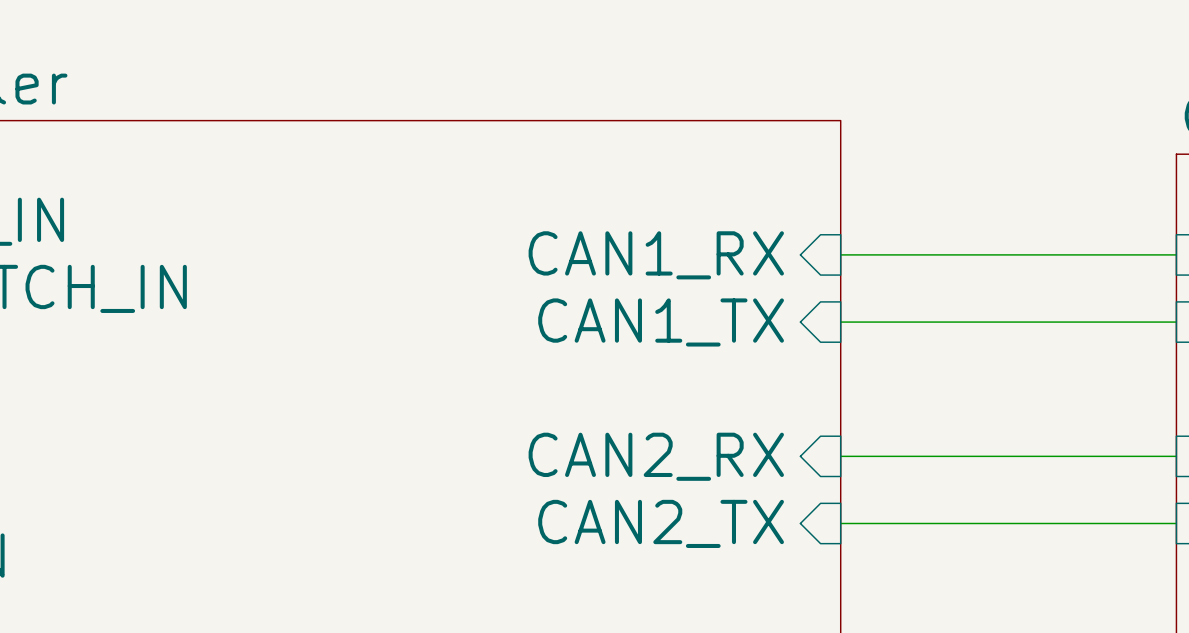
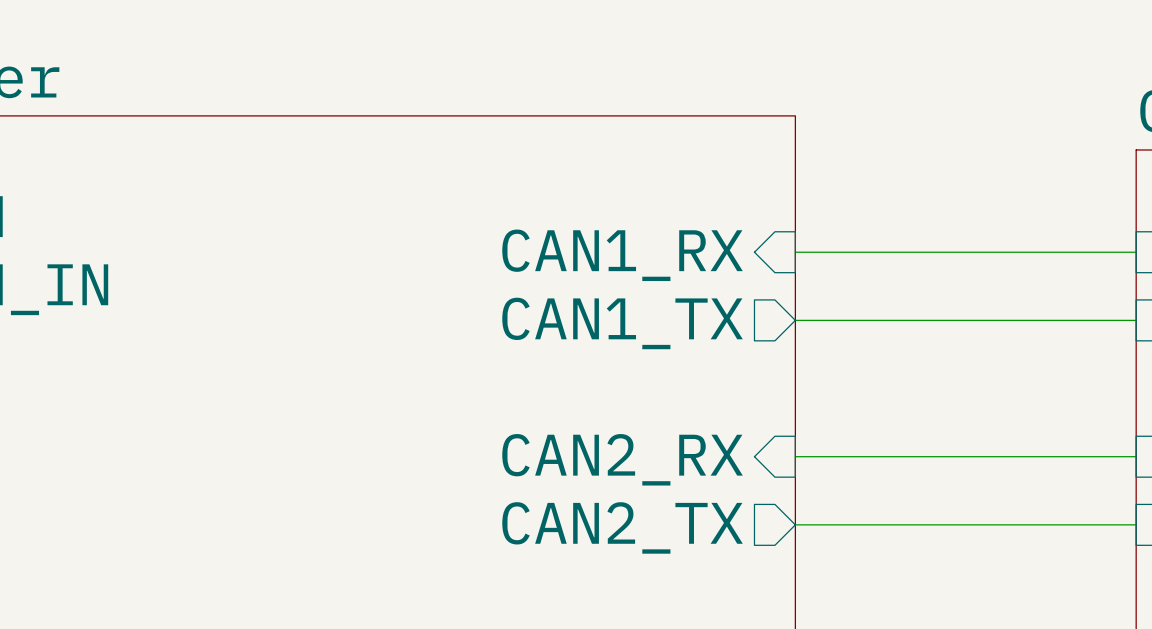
sheet pin shape: input (661, 322) -> output (622, 323)
sheet pin shape: input (661, 523) -> output (622, 527)

